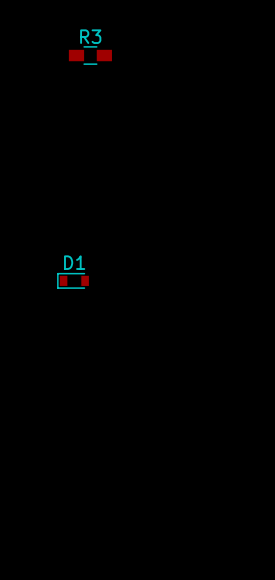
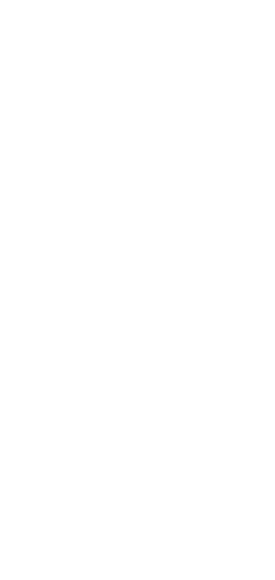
R3: (90, 55) -> none
D1: (73, 280) -> none

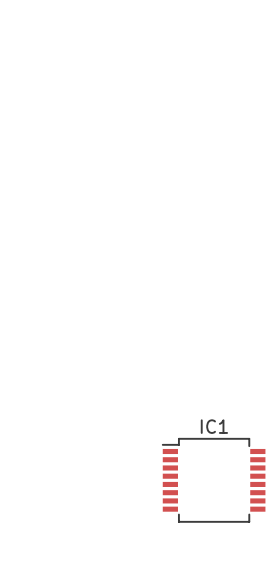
IC1: none -> (213, 480)

